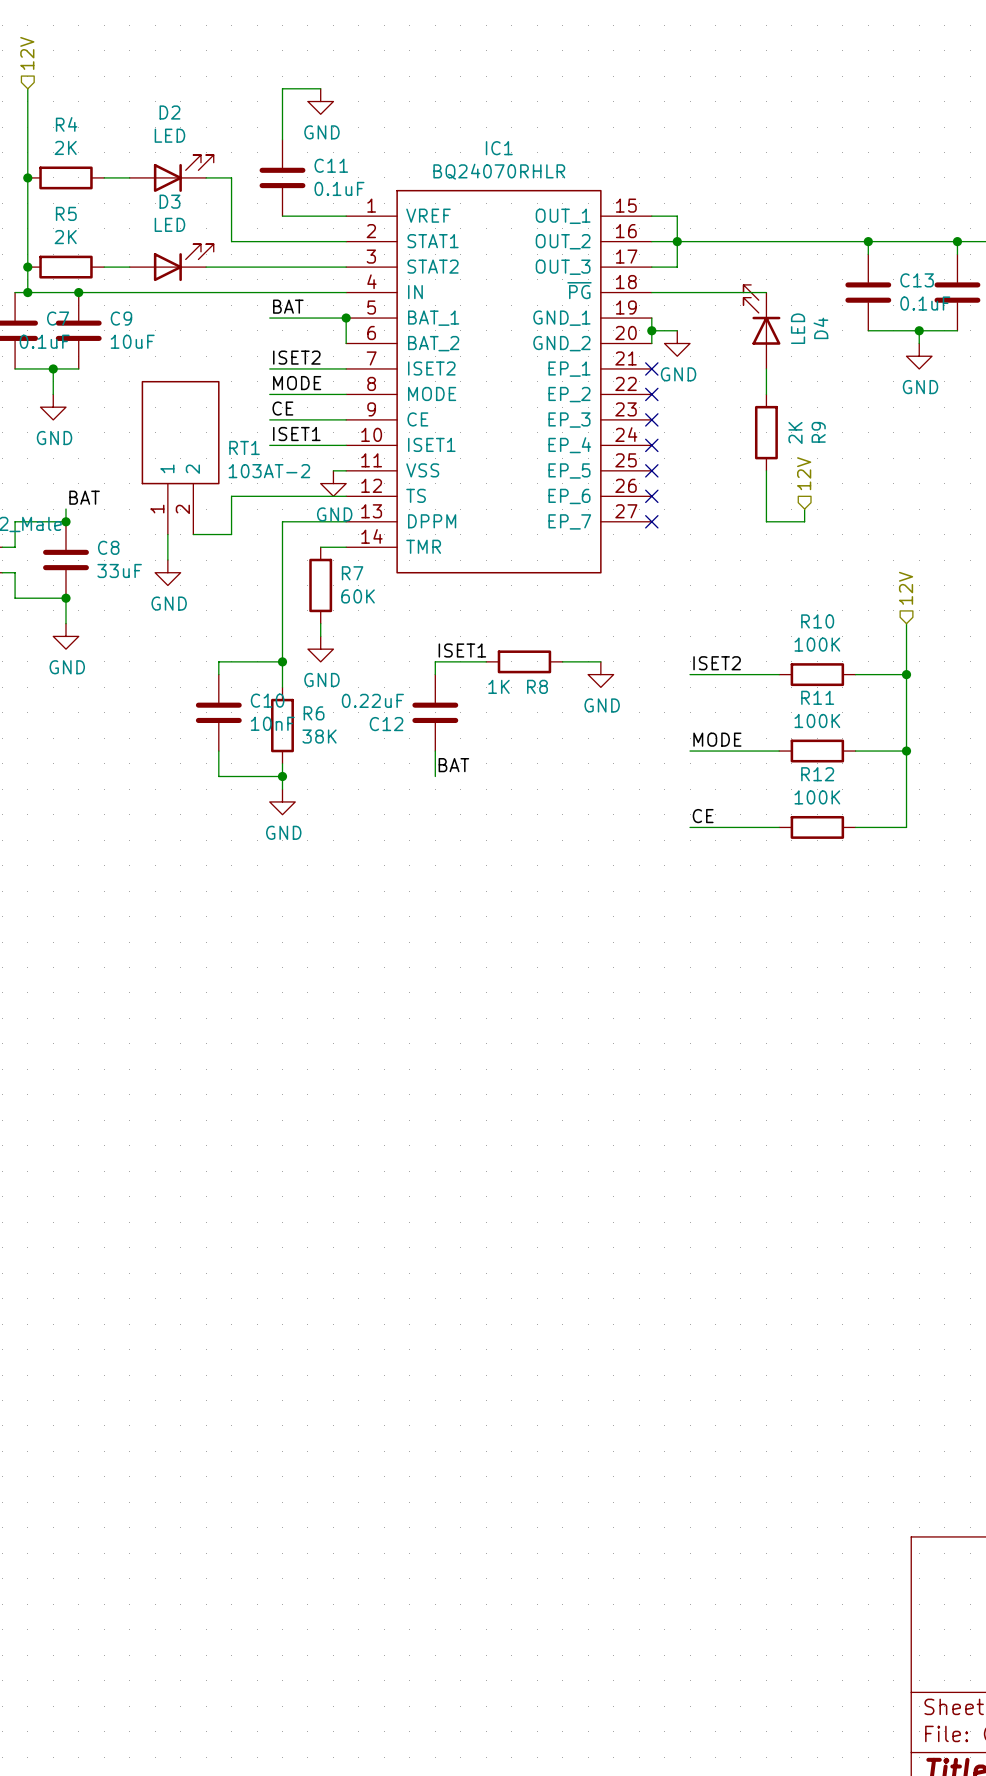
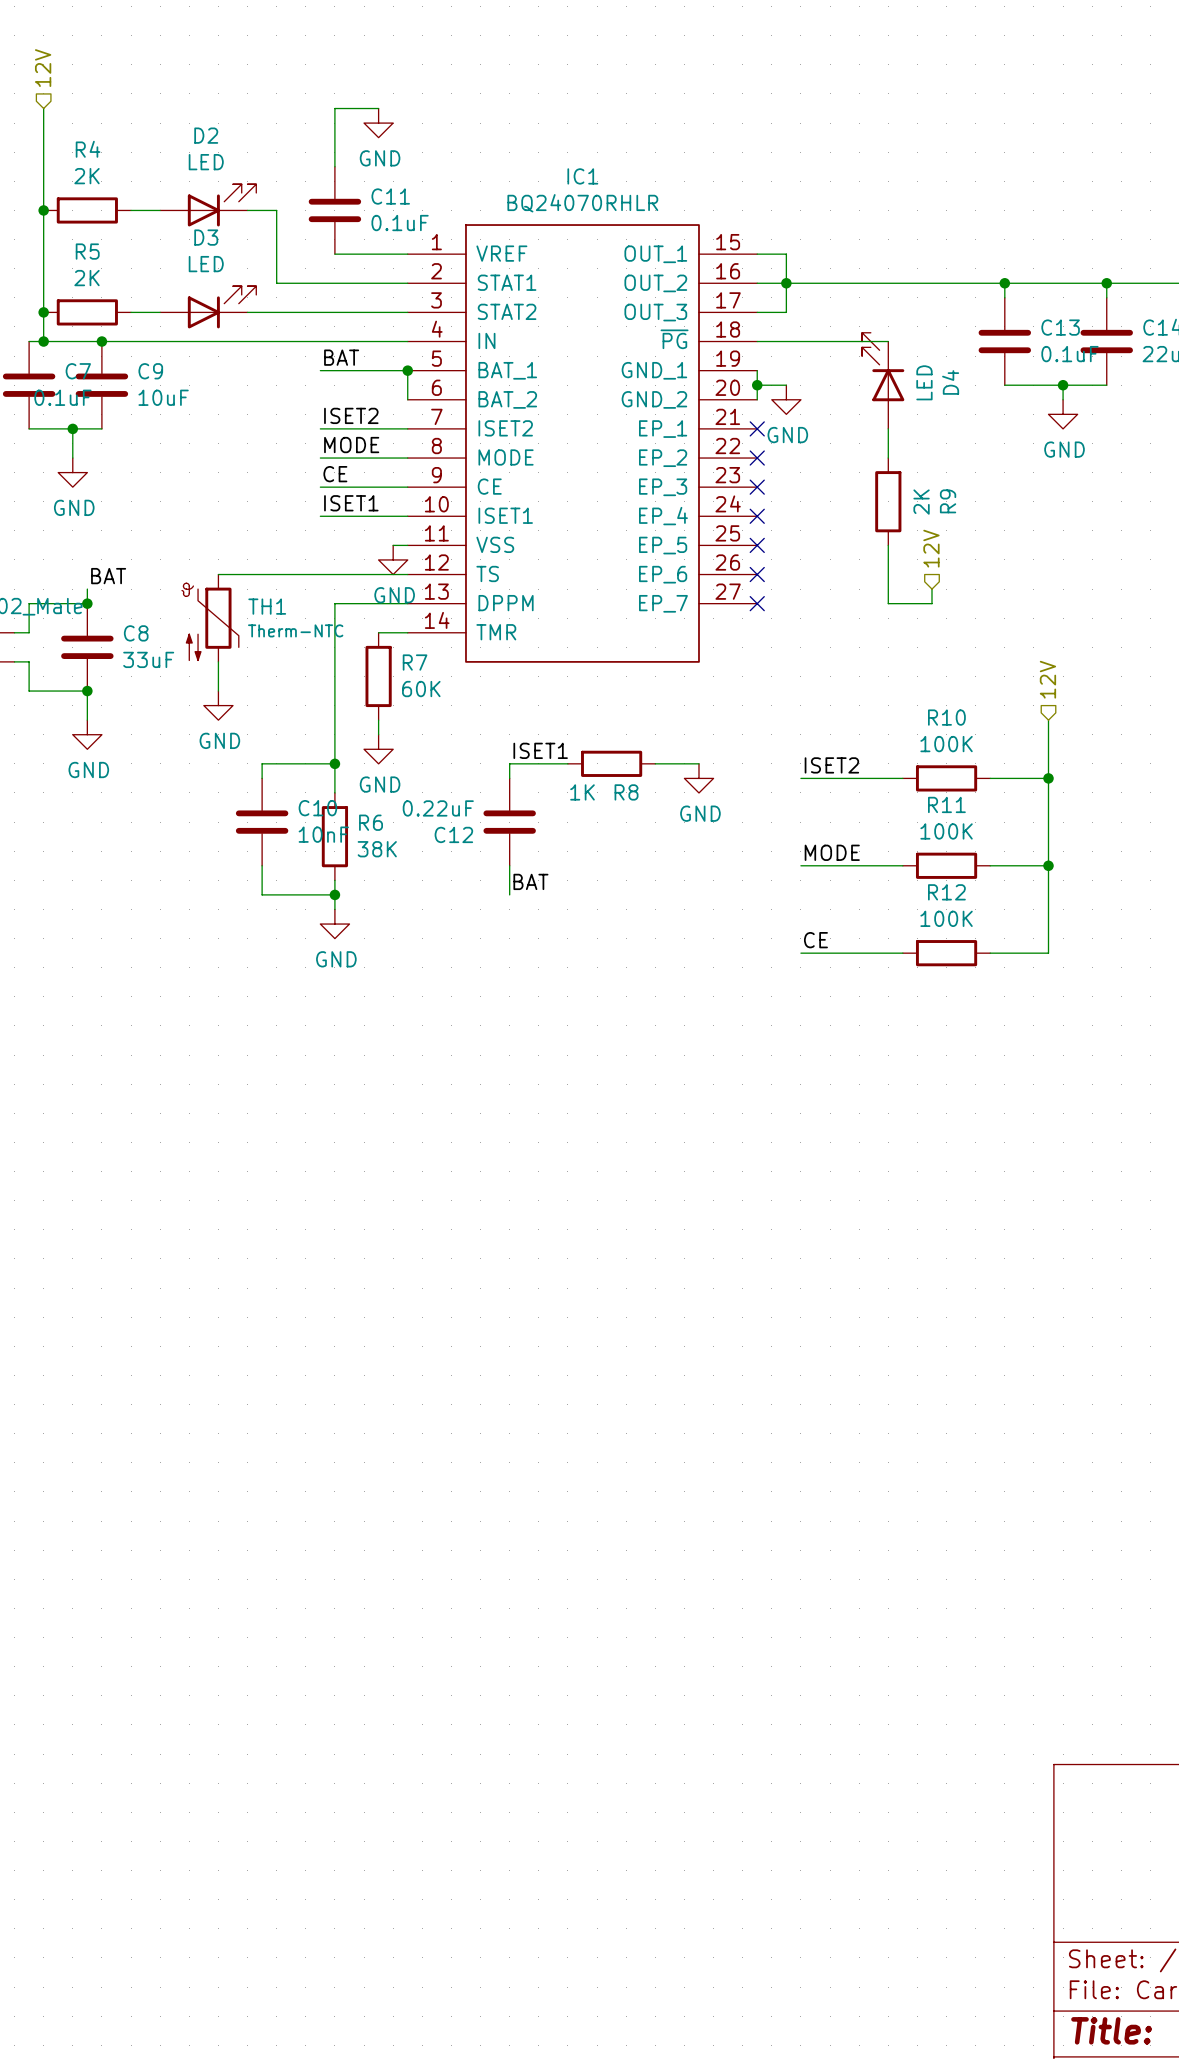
RT1: 103AT-2 (180, 457) -> none
wire: (231, 496) (231, 534) (193, 534) -> (276, 574) (218, 574)
wire: (167, 534) (167, 560) -> (218, 661) (218, 691)
TH1: none -> Therm-NTC (210, 618)
power symbol position: GND (167, 572) -> GND (218, 705)

